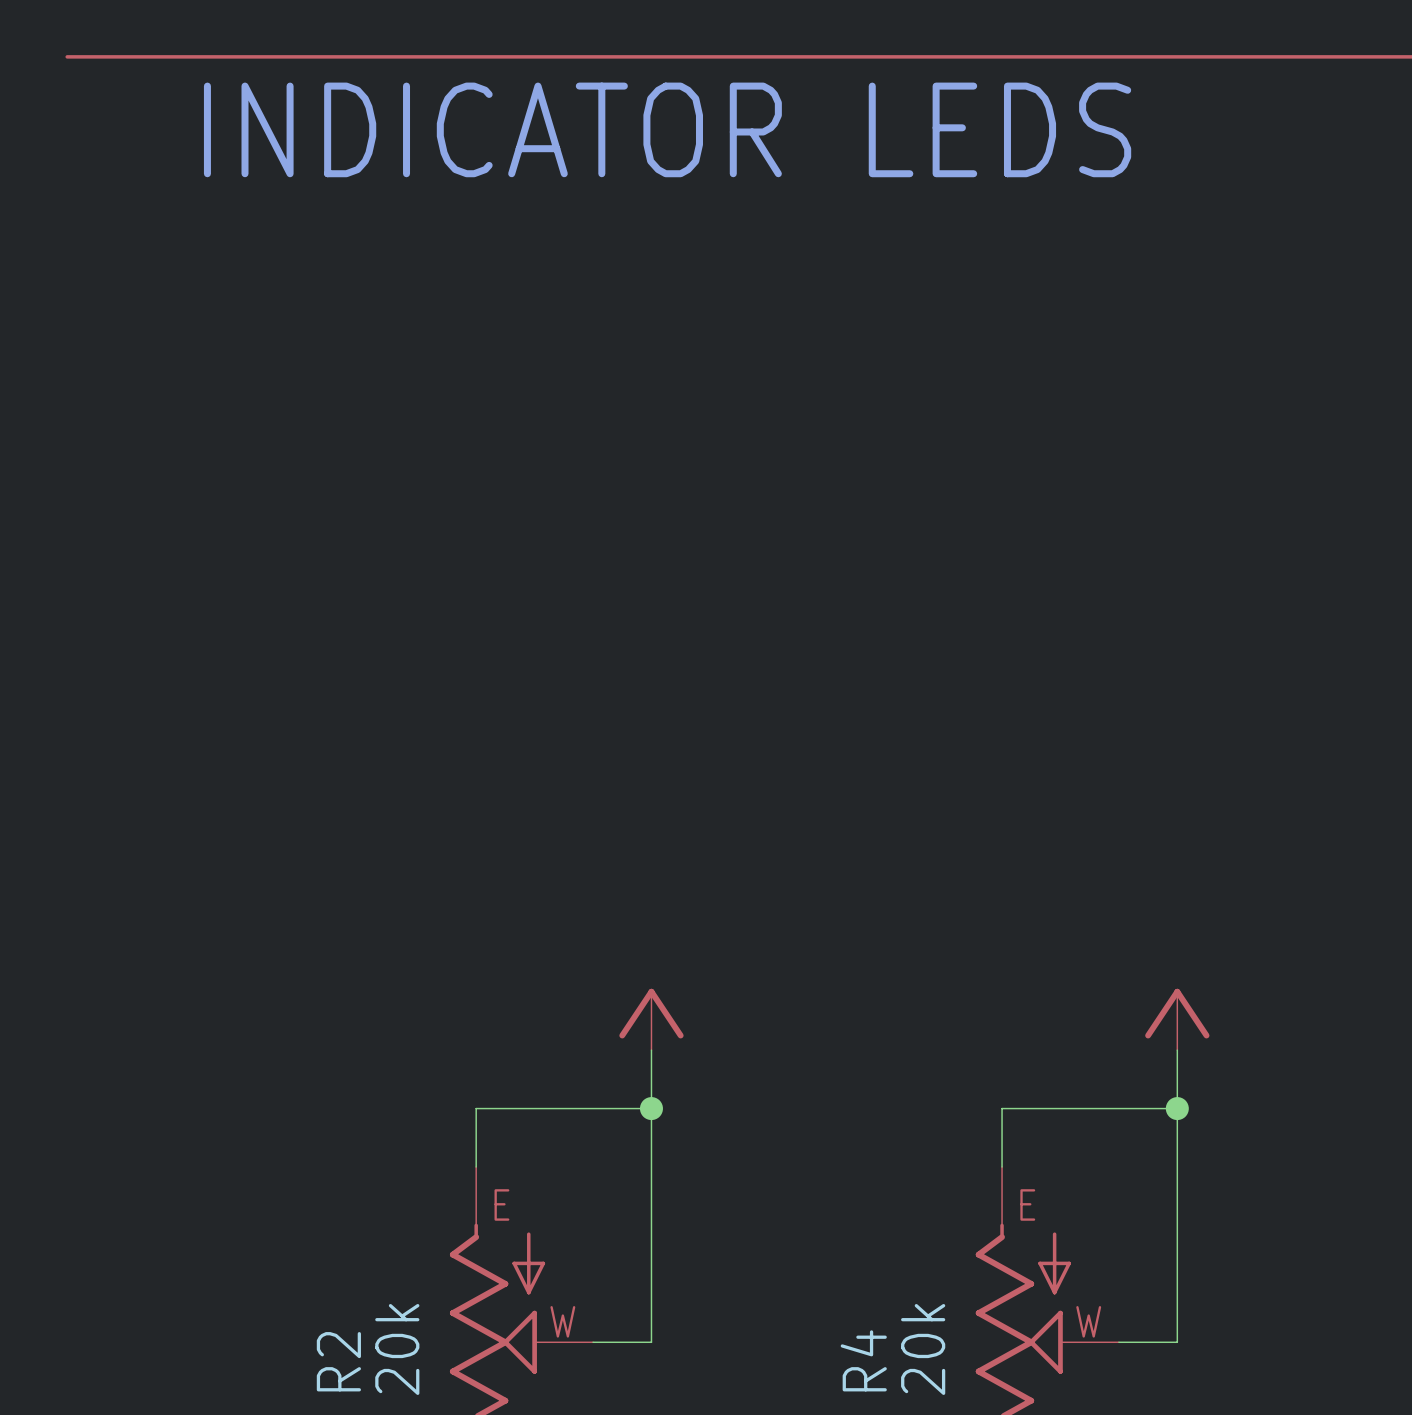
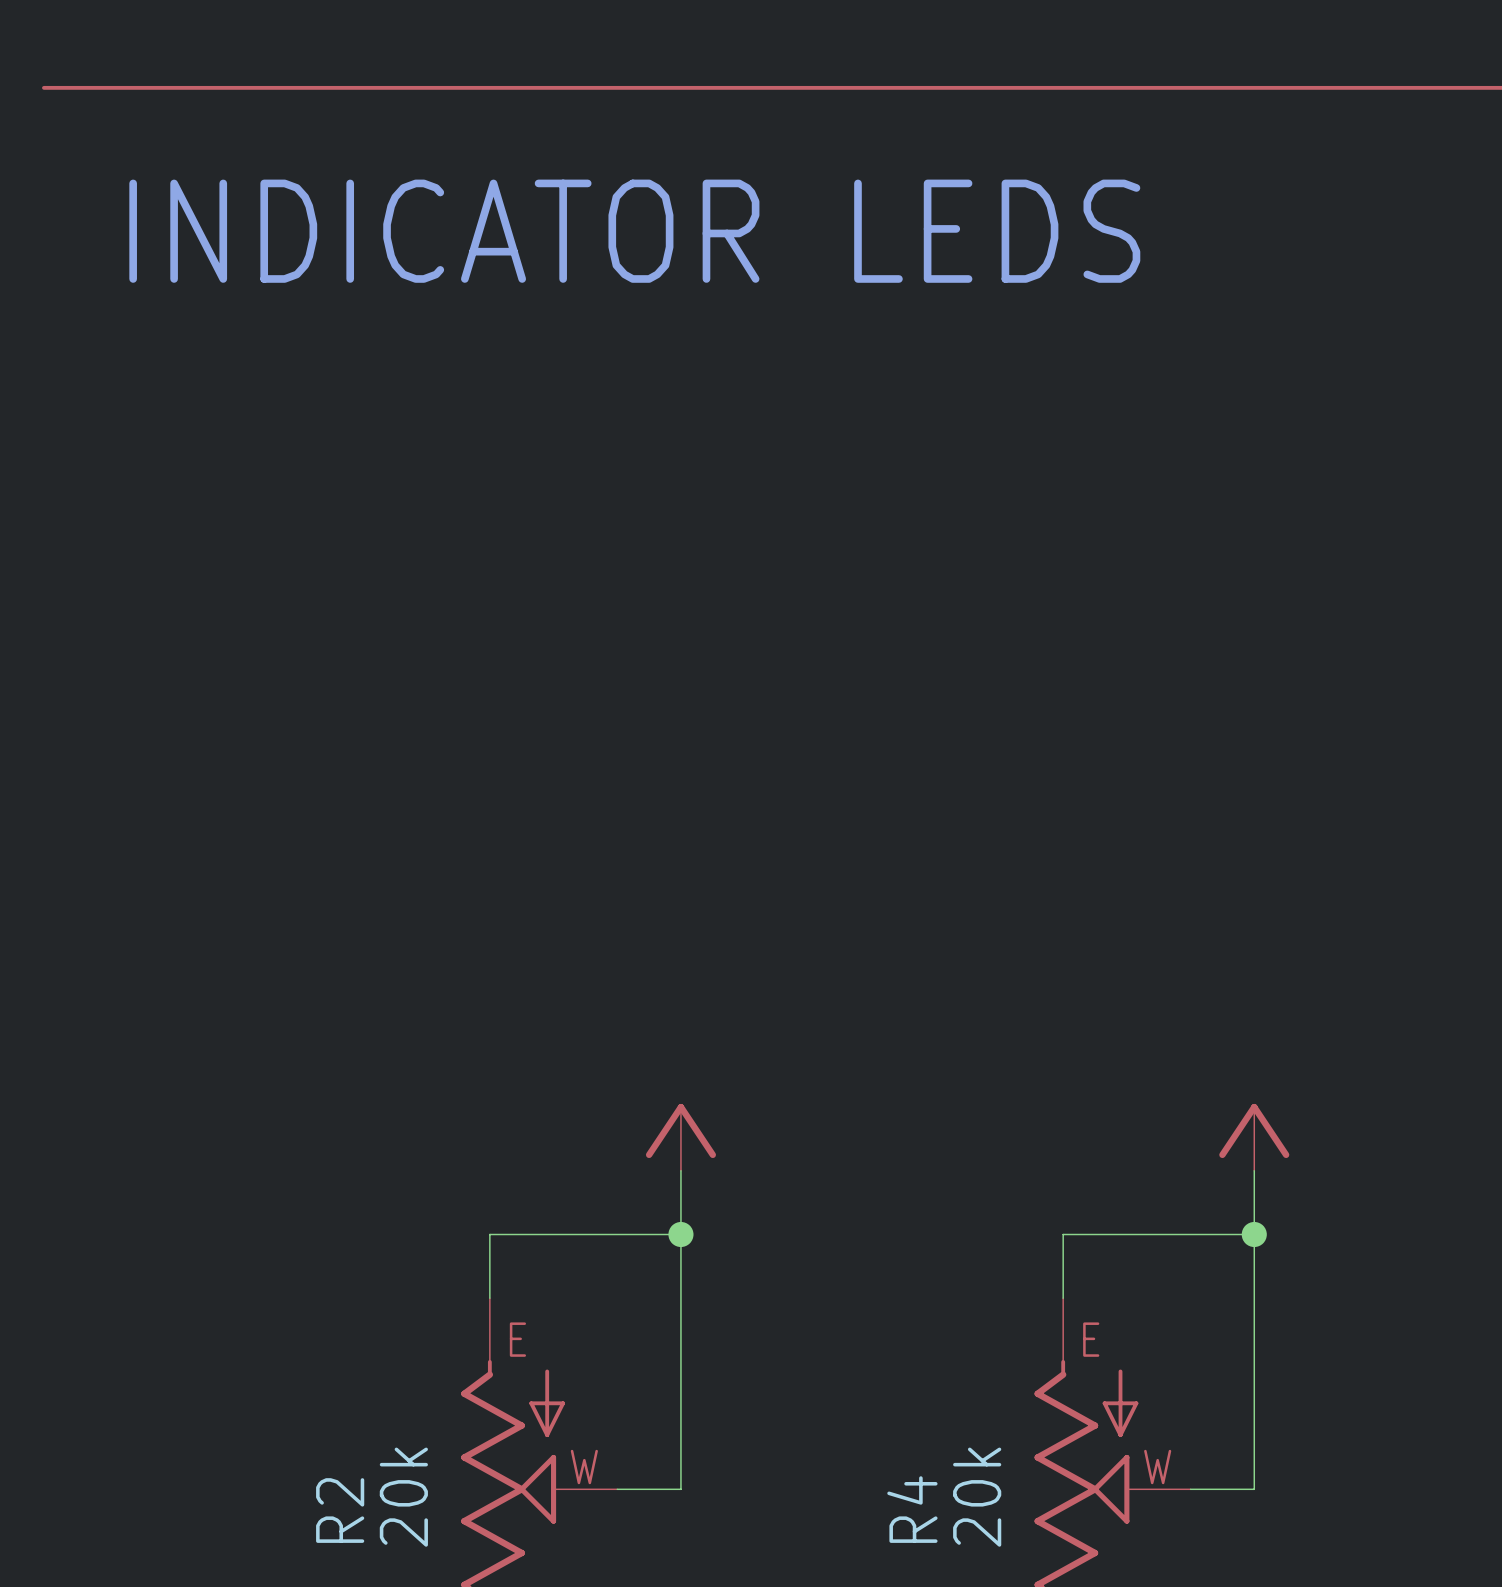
text position: INDICATOR LEDS (667, 129) -> INDICATOR LEDS (634, 231)

